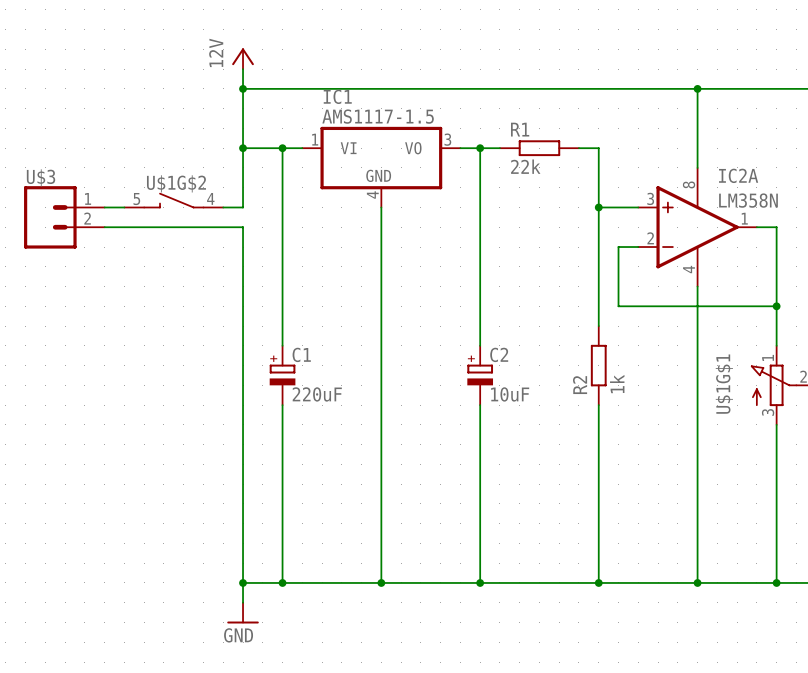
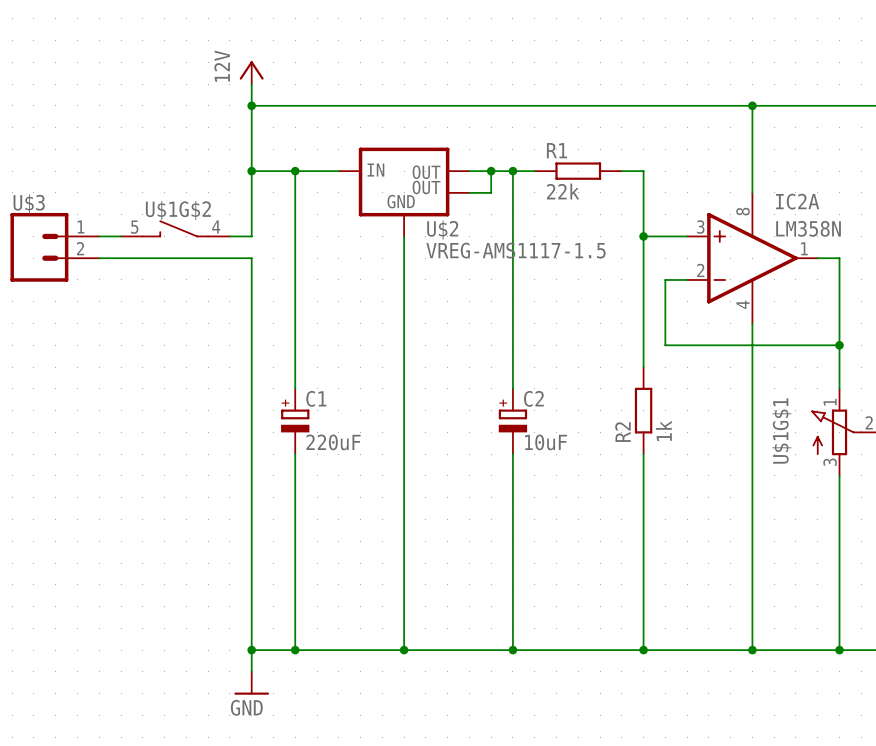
wire: none -> (469, 171) (491, 171) (491, 192) (469, 192)
junction: none -> (491, 171)
IC1: AMS1117-1.5 (381, 167) -> none
U$2: none -> VREG-AMS1117-1.5 (404, 192)

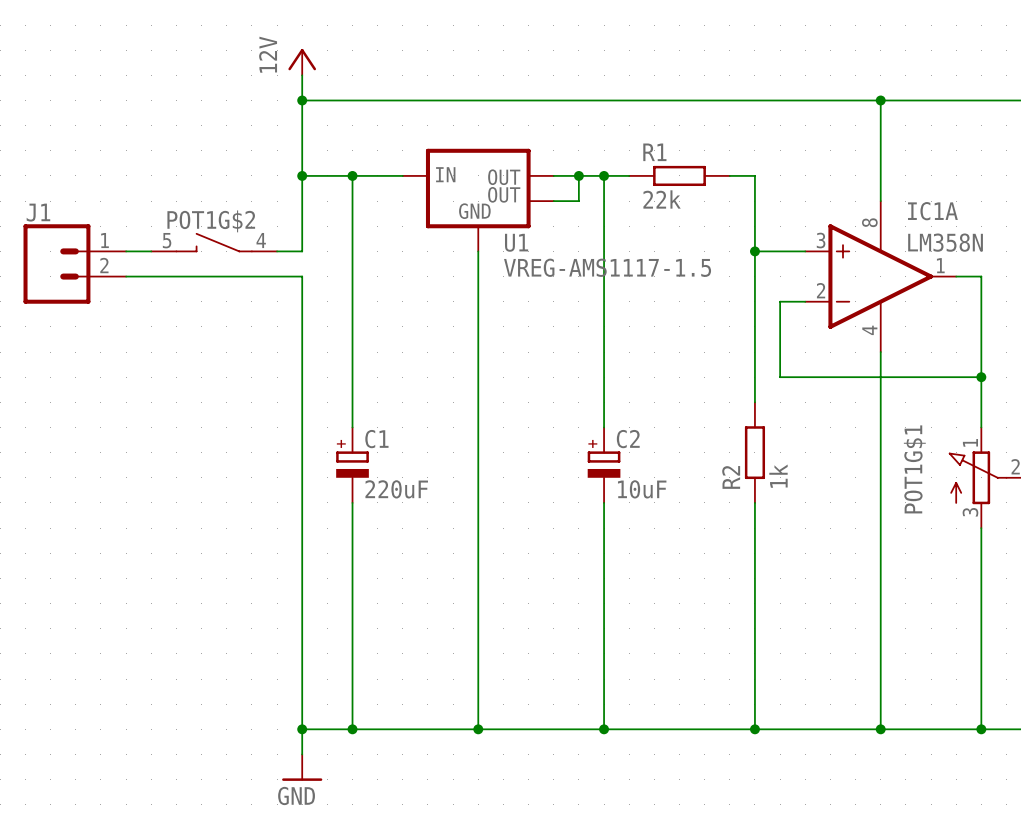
IC2A name: IC2A (797, 201) -> IC1A (932, 211)
U$3 name: U$3 (29, 203) -> J1 (38, 212)
U$1G$2 name: U$1G$2 (178, 210) -> POT1G$2 (211, 221)
U$2 name: U$2 (442, 230) -> U1 (516, 242)
U$1G$1 name: U$1G$1 (781, 431) -> POT1G$1 (914, 469)

